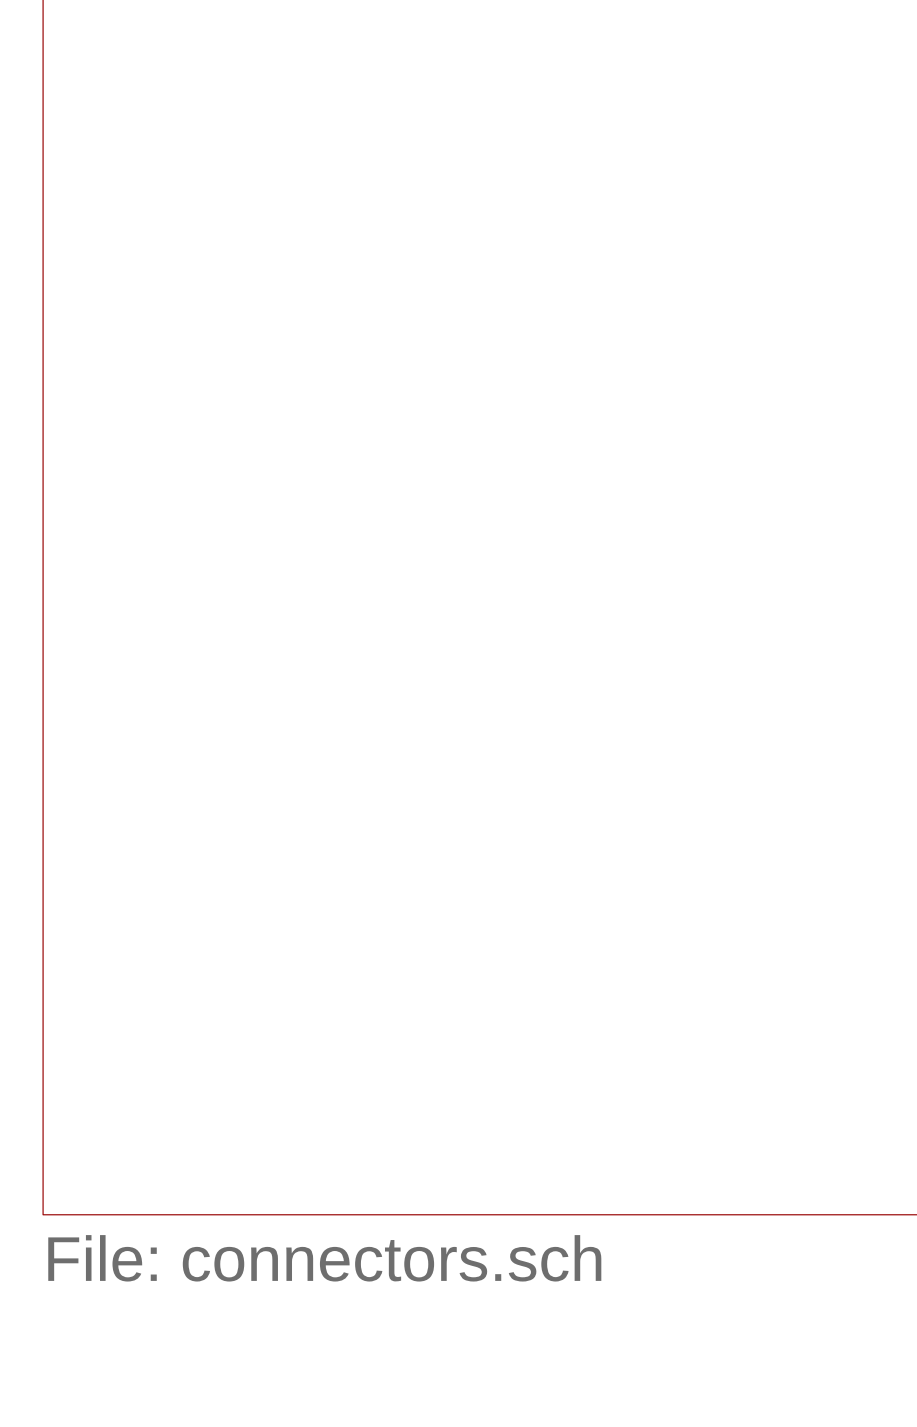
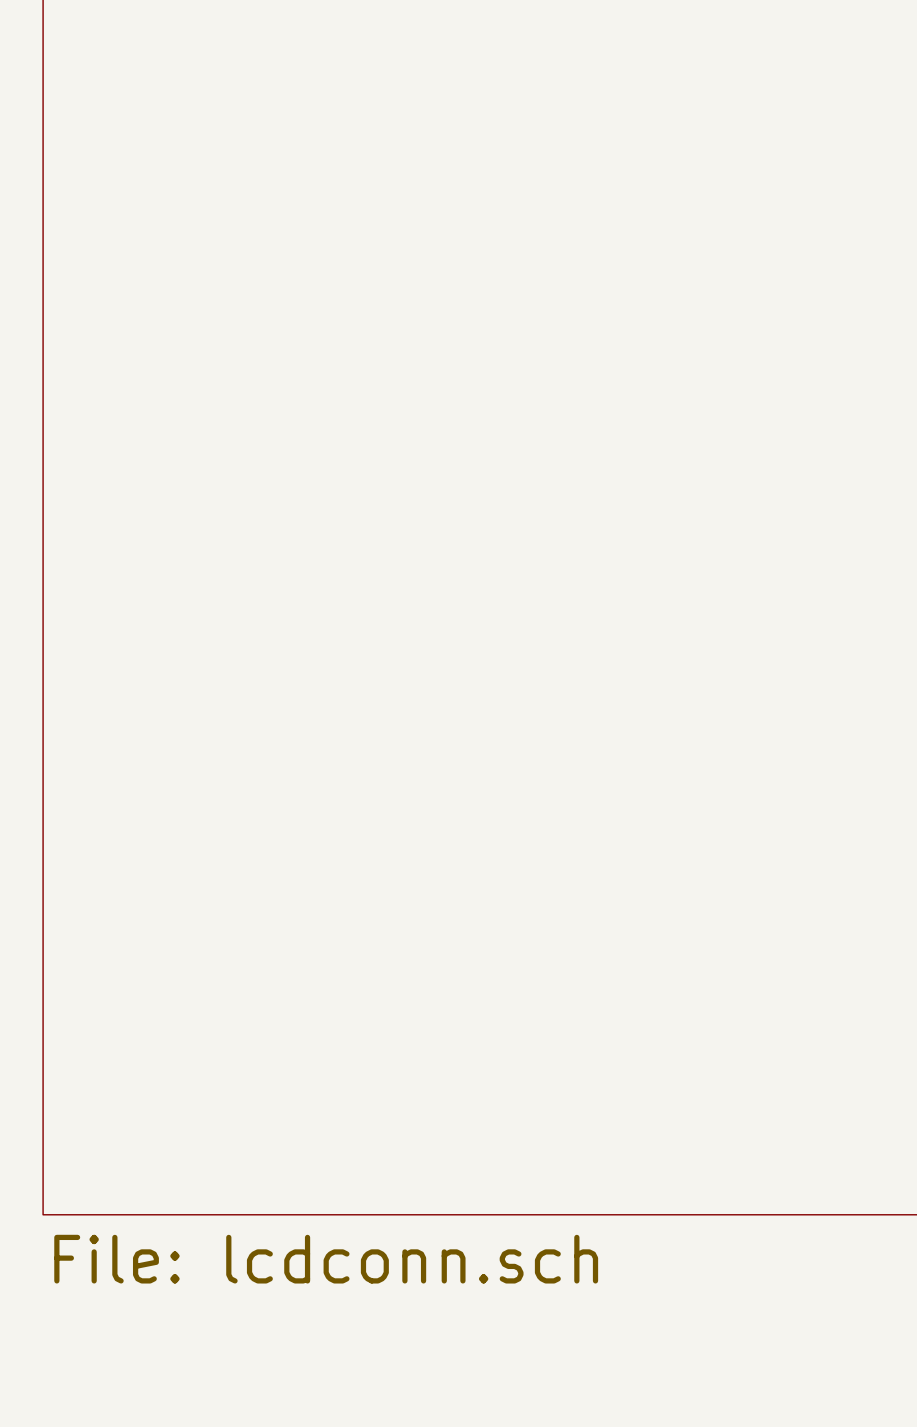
sheet value: File: connectors.sch (324, 1258) -> File: lcdconn.sch (326, 1259)

